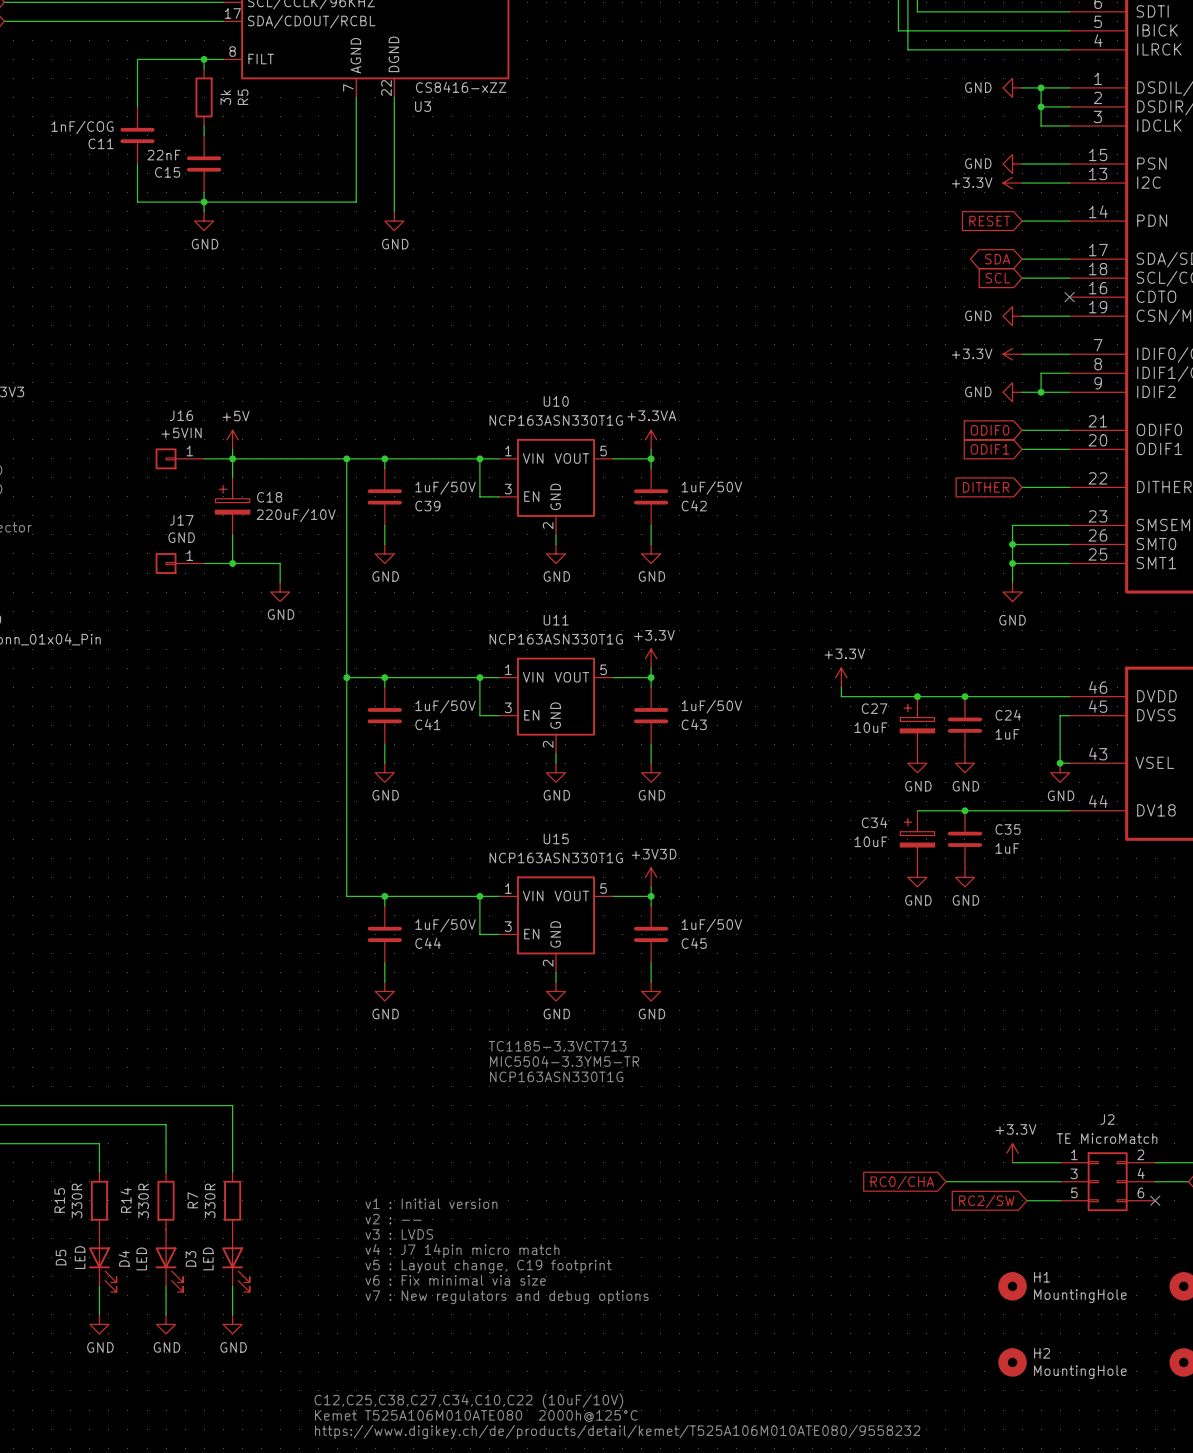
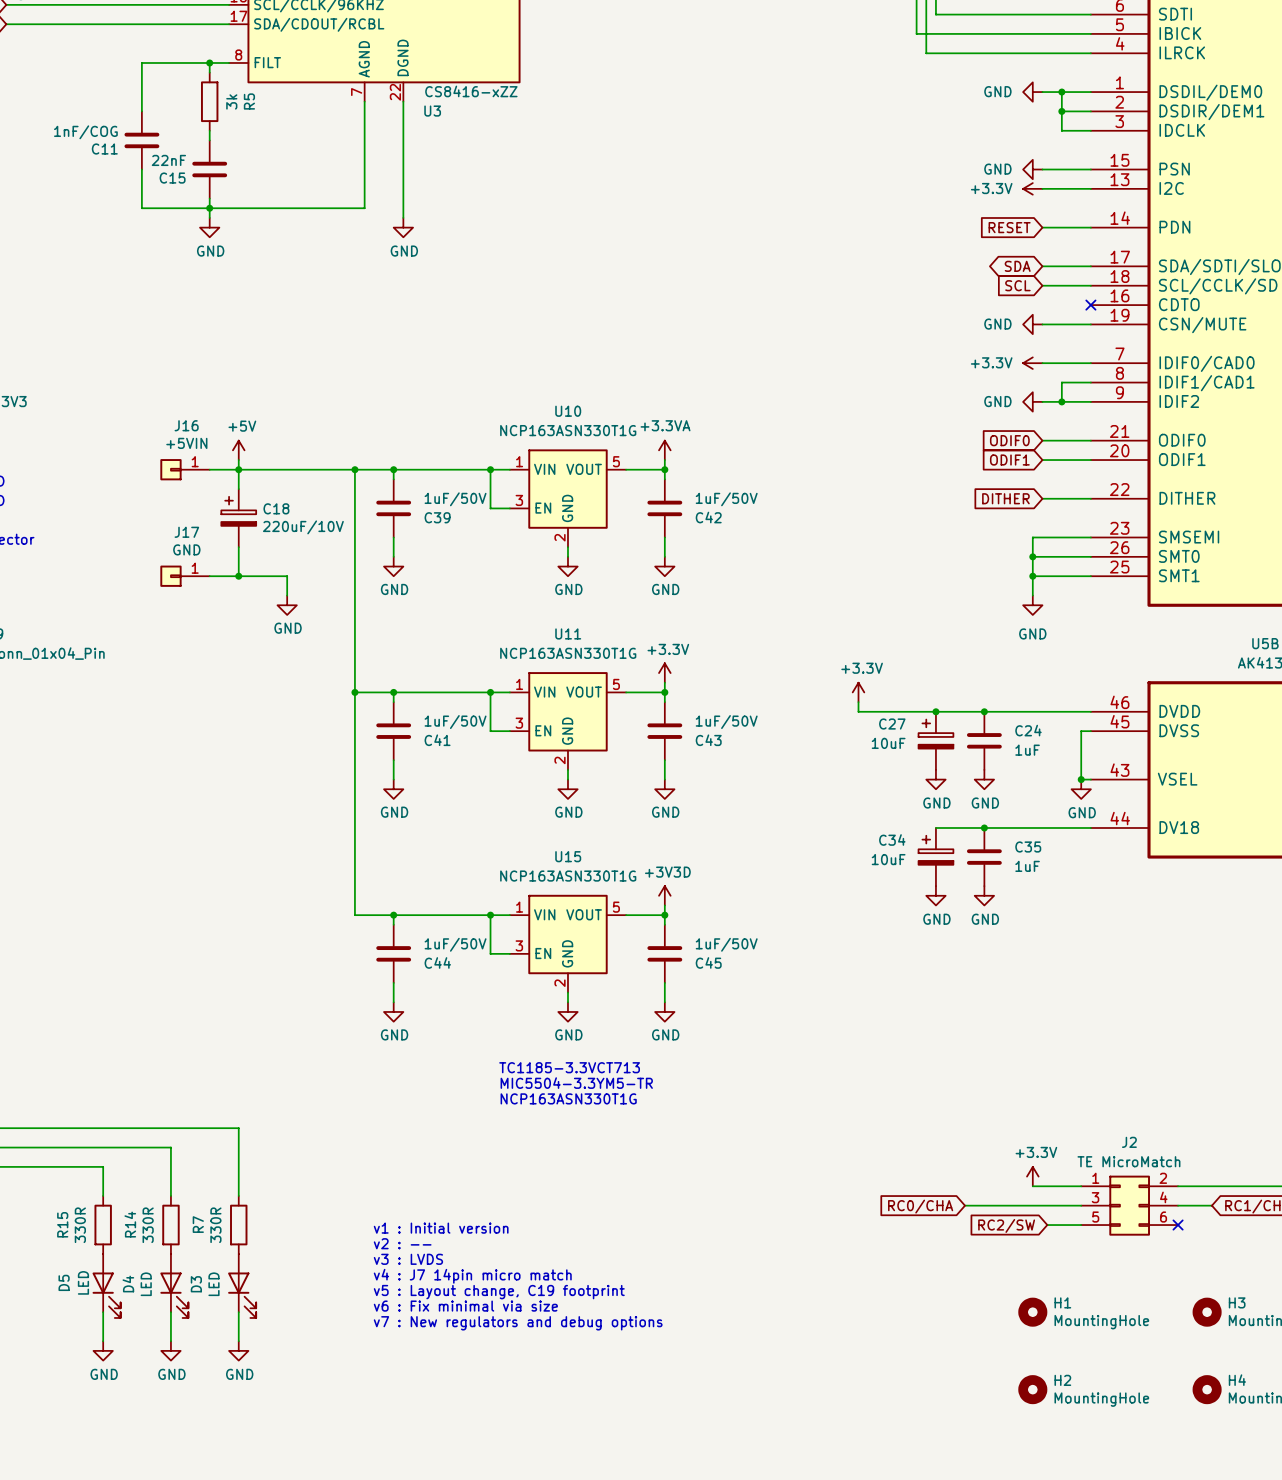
text: C12,C25,C38,C27,C34,C10,C22 (10uF/10V) (468, 1401) -> none
text: Kemet T525A106M010ATE080 2000h@125°C (476, 1416) -> none
text: https://www.digikey.ch/de/products/detail/kemet/T525A106M010ATE080/9558232 (617, 1432) -> none

